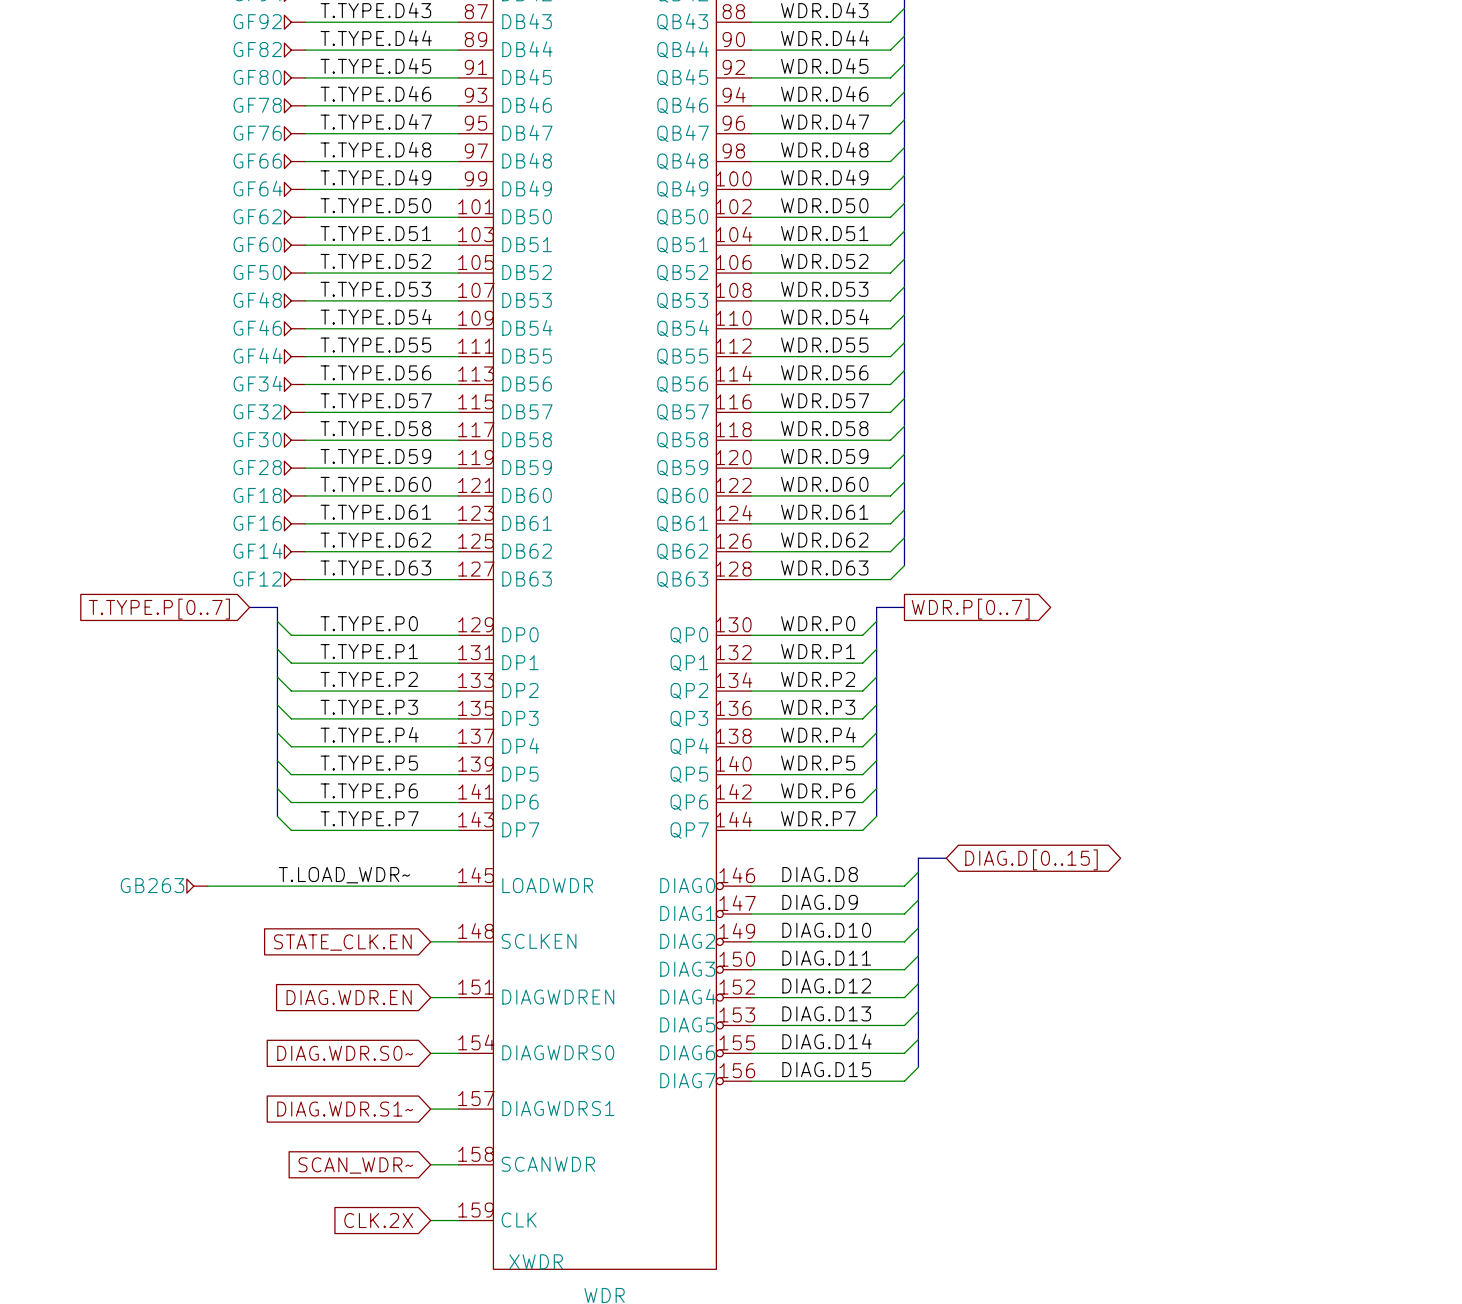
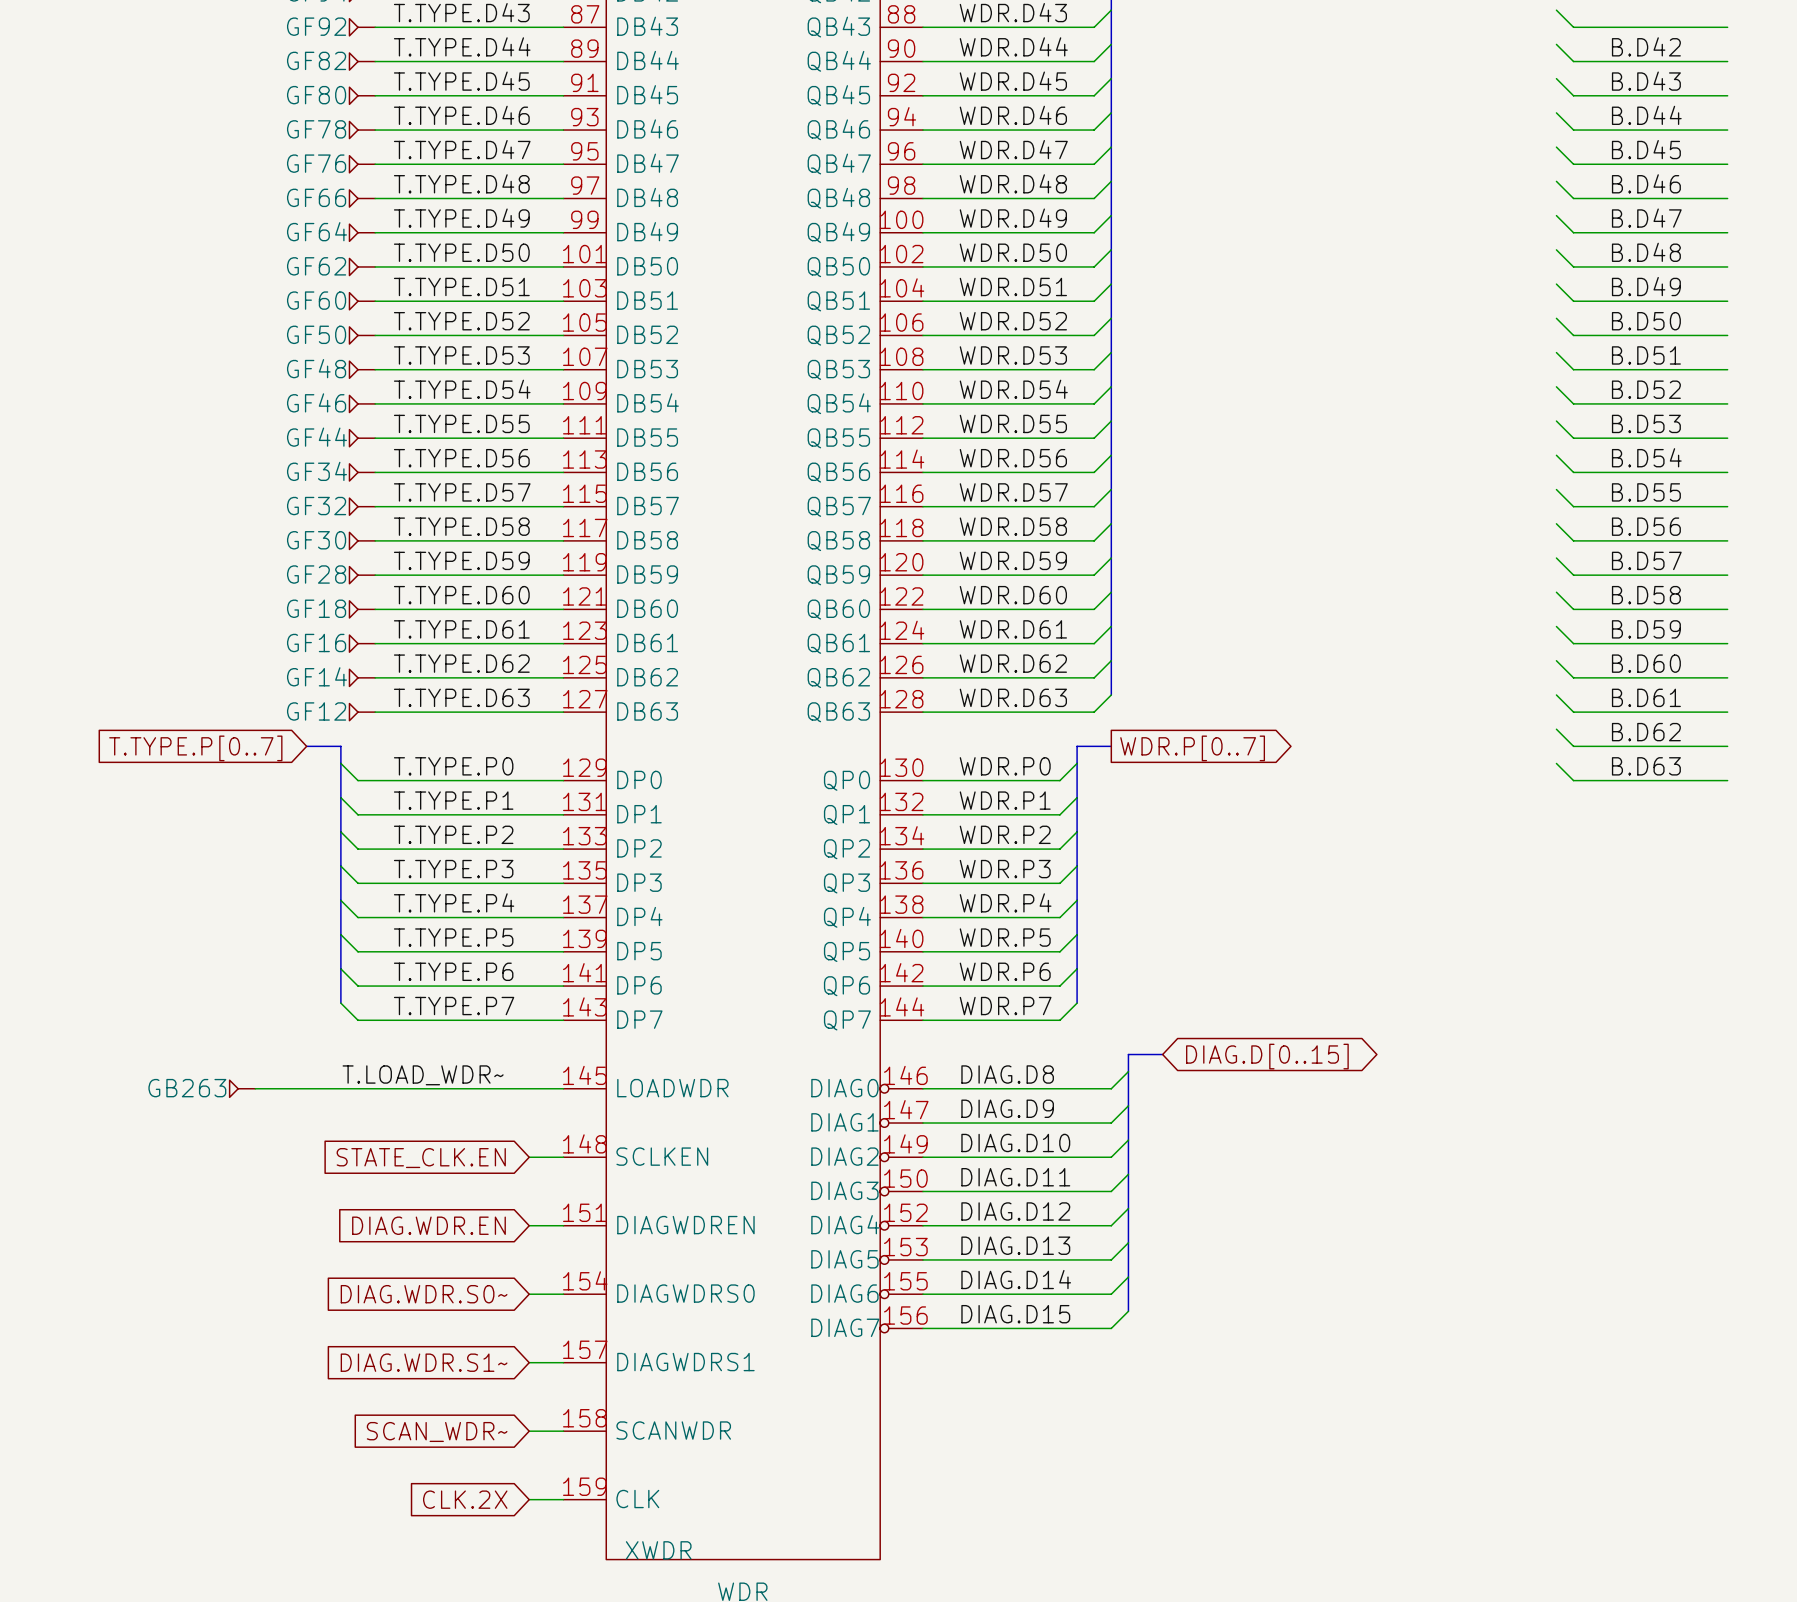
wire: none -> (1556, 10) (1573, 27) (1727, 27)
wire: none -> (1556, 44) (1573, 61) (1727, 61)
label: none -> B.D42 (1646, 46)
wire: none -> (1556, 78) (1573, 95) (1727, 95)
label: none -> B.D43 (1646, 81)
wire: none -> (1556, 112) (1573, 130) (1727, 130)
label: none -> B.D44 (1646, 115)
wire: none -> (1556, 147) (1573, 164) (1727, 164)
label: none -> B.D45 (1646, 149)
wire: none -> (1556, 181) (1573, 198) (1727, 198)
label: none -> B.D46 (1646, 183)
wire: none -> (1556, 215) (1573, 232) (1727, 232)
label: none -> B.D47 (1646, 218)
wire: none -> (1556, 249) (1573, 266) (1727, 266)
label: none -> B.D48 (1646, 252)
wire: none -> (1556, 284) (1573, 301) (1727, 301)
label: none -> B.D49 (1646, 286)
wire: none -> (1556, 318) (1573, 335) (1727, 335)
label: none -> B.D50 (1646, 321)
wire: none -> (1556, 352) (1573, 369) (1727, 369)
label: none -> B.D51 (1646, 355)
wire: none -> (1556, 386) (1573, 403) (1727, 403)
label: none -> B.D52 (1646, 389)
wire: none -> (1556, 421) (1573, 438) (1727, 438)
label: none -> B.D53 (1646, 423)
wire: none -> (1556, 455) (1573, 472) (1727, 472)
label: none -> B.D54 (1646, 457)
wire: none -> (1556, 489) (1573, 506) (1727, 506)
label: none -> B.D55 (1646, 492)
wire: none -> (1556, 523) (1573, 540) (1727, 540)
label: none -> B.D56 (1646, 526)
wire: none -> (1556, 558) (1573, 575) (1727, 575)
label: none -> B.D57 (1646, 560)
wire: none -> (1556, 592) (1573, 609) (1727, 609)
label: none -> B.D58 (1646, 595)
wire: none -> (1556, 626) (1573, 643) (1727, 643)
label: none -> B.D59 (1646, 629)
wire: none -> (1556, 660) (1573, 677) (1727, 677)
label: none -> B.D60 (1646, 663)
wire: none -> (1556, 694) (1573, 712) (1727, 712)
label: none -> B.D61 (1646, 697)
wire: none -> (1556, 729) (1573, 746) (1727, 746)
label: none -> B.D62 (1646, 732)
wire: none -> (1556, 763) (1573, 780) (1727, 780)
label: none -> B.D63 (1646, 766)

